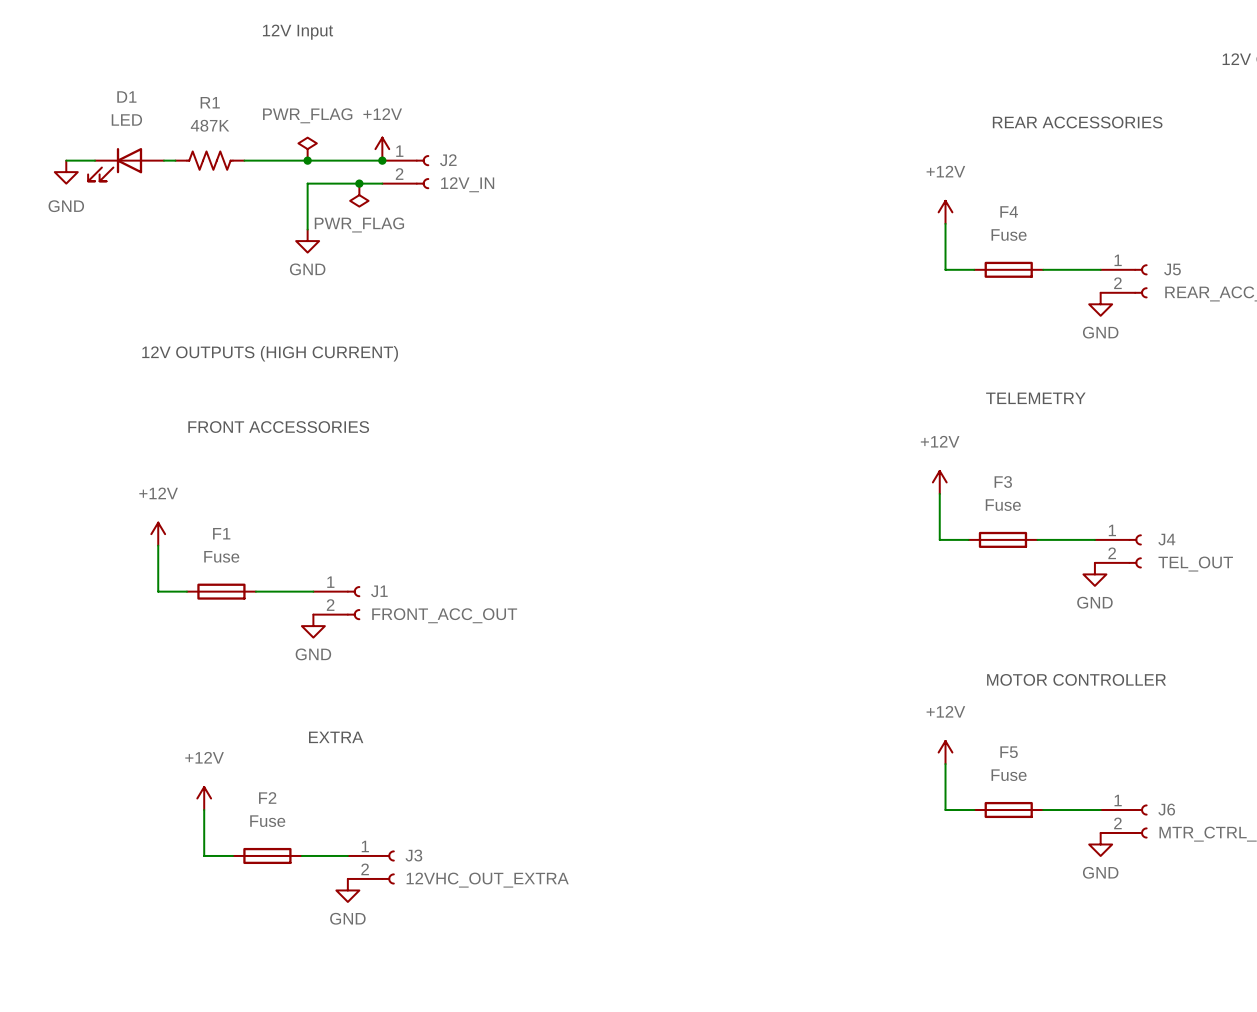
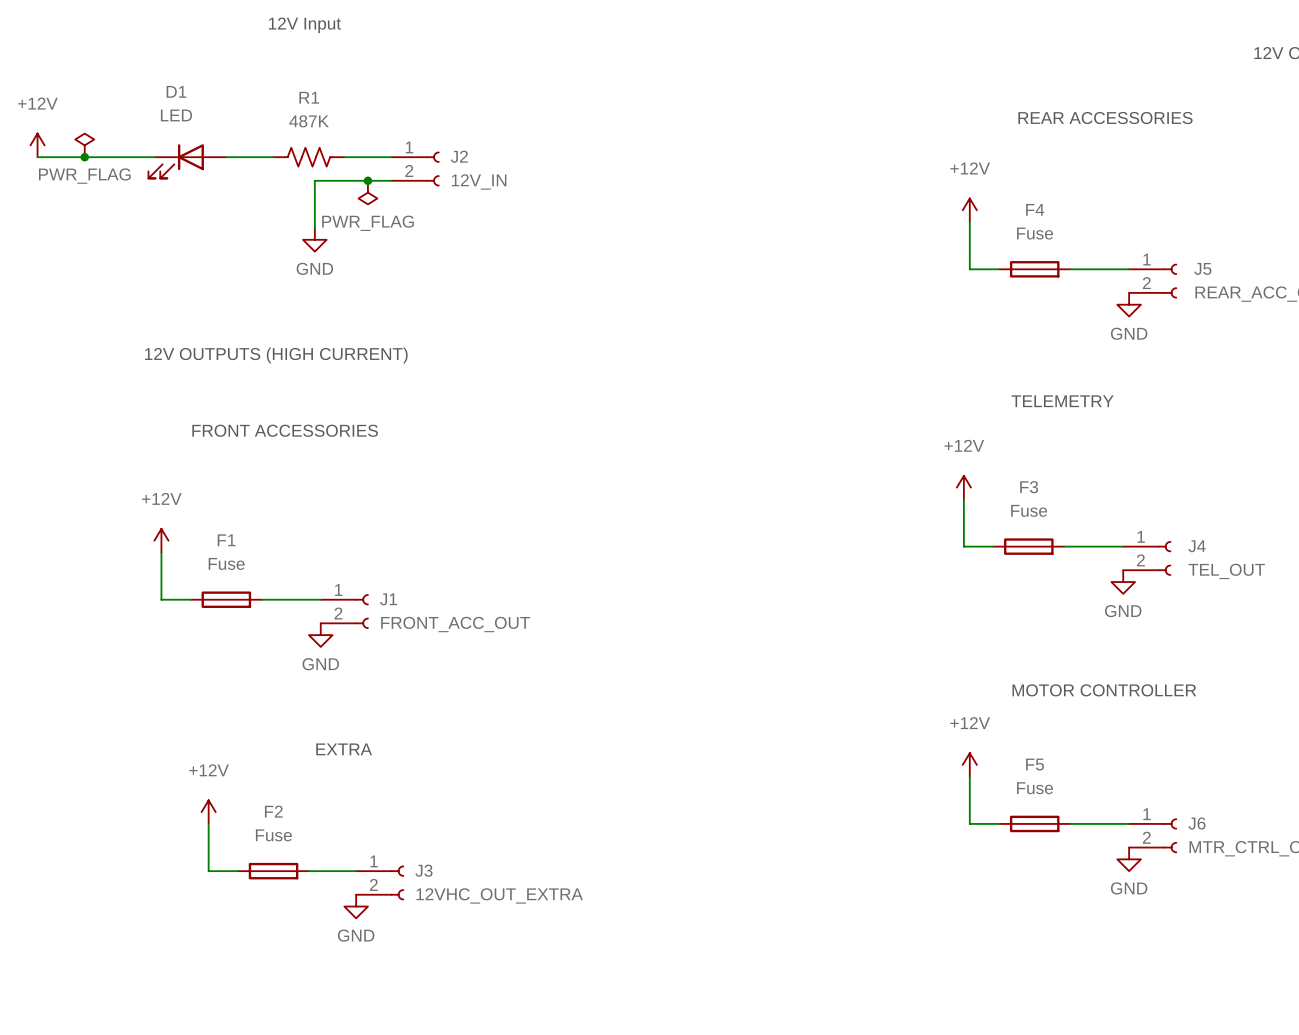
D1 name position: D1 (126, 96) -> D1 (176, 91)
power symbol text position: PWR_FLAG (307, 115) -> PWR_FLAG (84, 176)
D1 value position: LED (126, 119) -> LED (176, 115)
power symbol: none -> +12V (37, 145)
power symbol position: PWR_FLAG (307, 149) -> PWR_FLAG (84, 145)
power symbol: +12V (382, 149) -> none
wire: none -> (37, 157) (67, 157)
junction: none -> (84, 157)
R1 position: (209, 160) -> (308, 157)
junction: (307, 160) -> none
junction: (382, 160) -> none
D1 position: (126, 164) -> (187, 161)
power symbol: GND (66, 172) -> none

